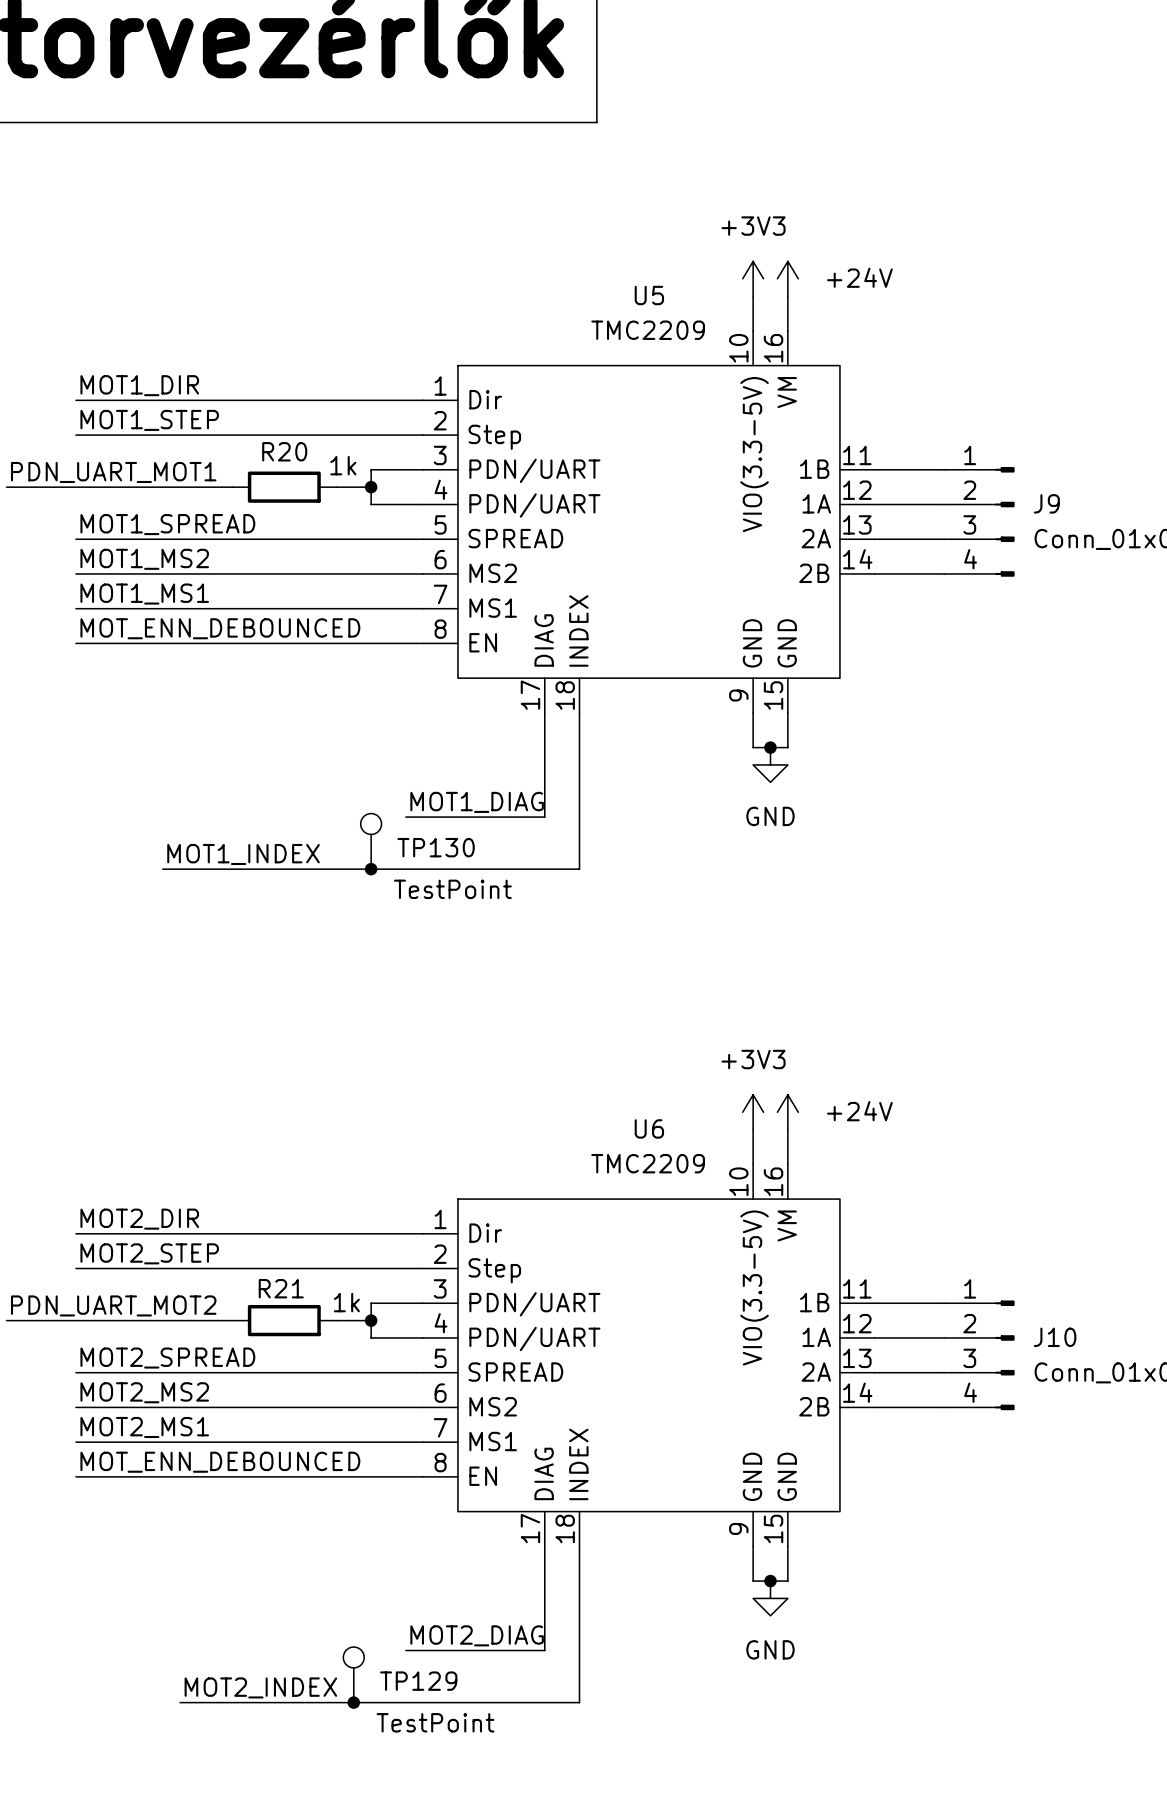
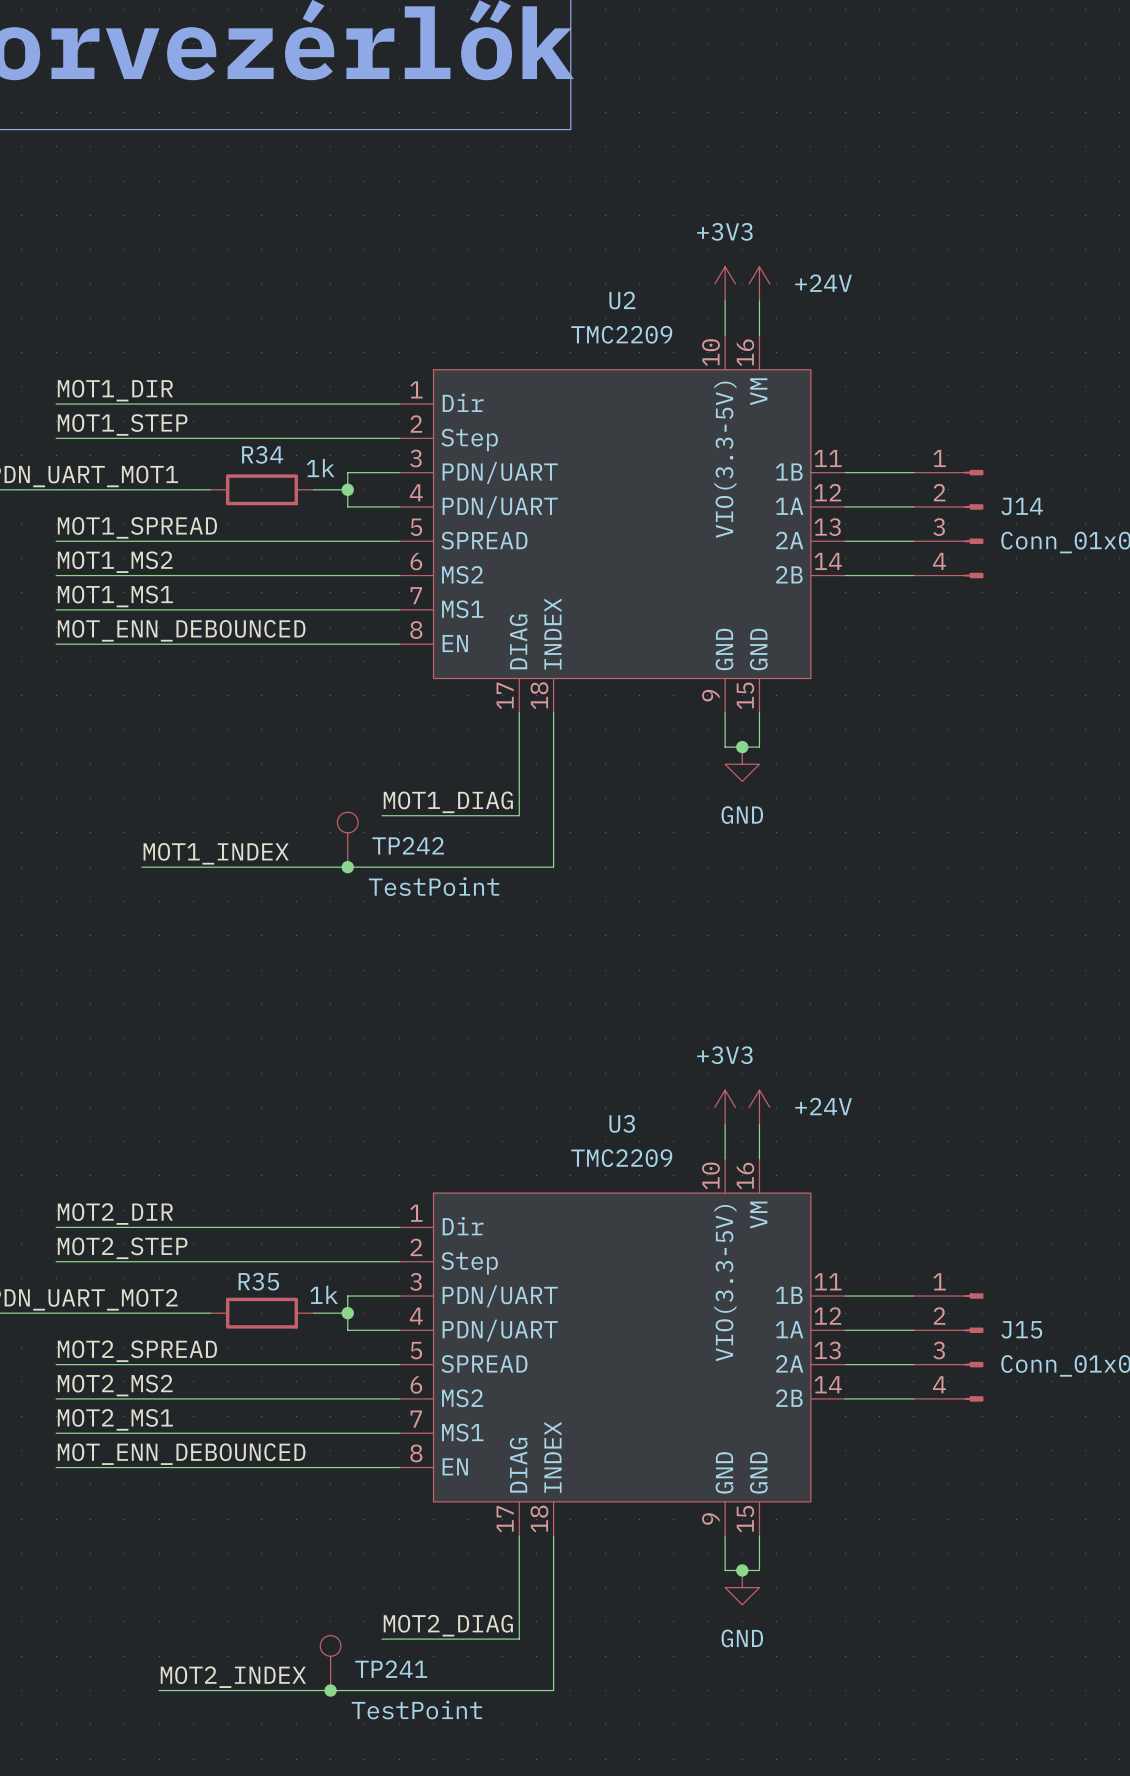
U5 name: U5 (649, 295) -> U2 (622, 300)
R20 name: R20 (284, 451) -> R34 (262, 454)
J9 name: J9 (1046, 503) -> J14 (1022, 506)
TP130 name: TP130 (436, 847) -> TP242 (408, 845)
U6 name: U6 (649, 1128) -> U3 (622, 1123)
R21 name: R21 (281, 1288) -> R35 (258, 1281)
J10 name: J10 (1055, 1337) -> J15 (1021, 1329)
TP129 name: TP129 (418, 1681) -> TP241 (391, 1669)

